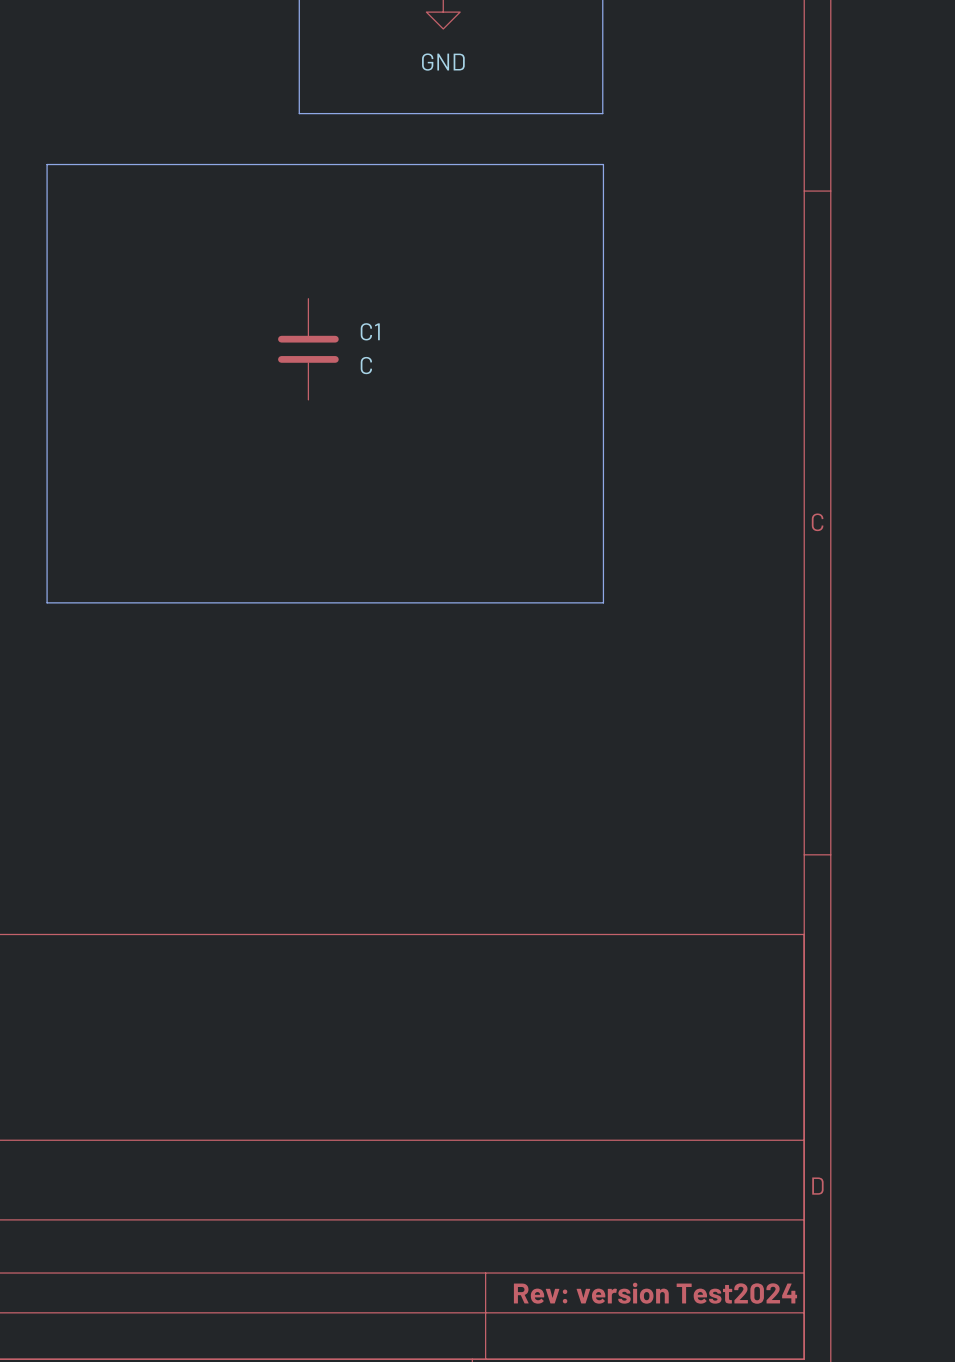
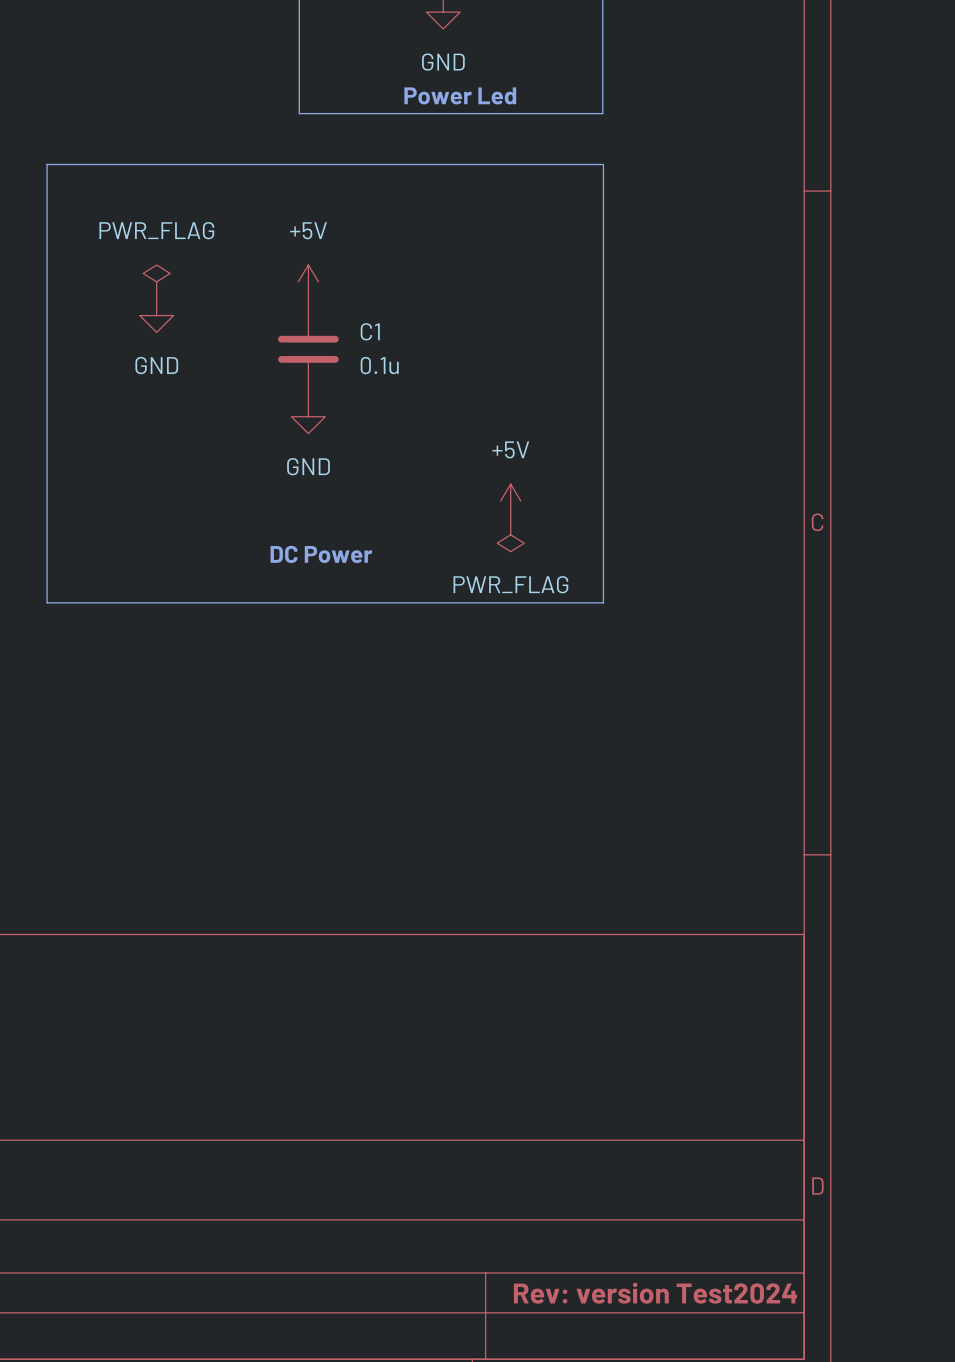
text: none -> Power Led (460, 95)
power symbol: none -> PWR_FLAG (156, 281)
power symbol: none -> +5V (308, 281)
power symbol: none -> GND (156, 315)
C1 value: C (366, 365) -> 0.1u (379, 365)
power symbol: none -> GND (308, 416)
power symbol: none -> +5V (510, 501)
power symbol: none -> PWR_FLAG (510, 534)
text: none -> DC Power (321, 554)

